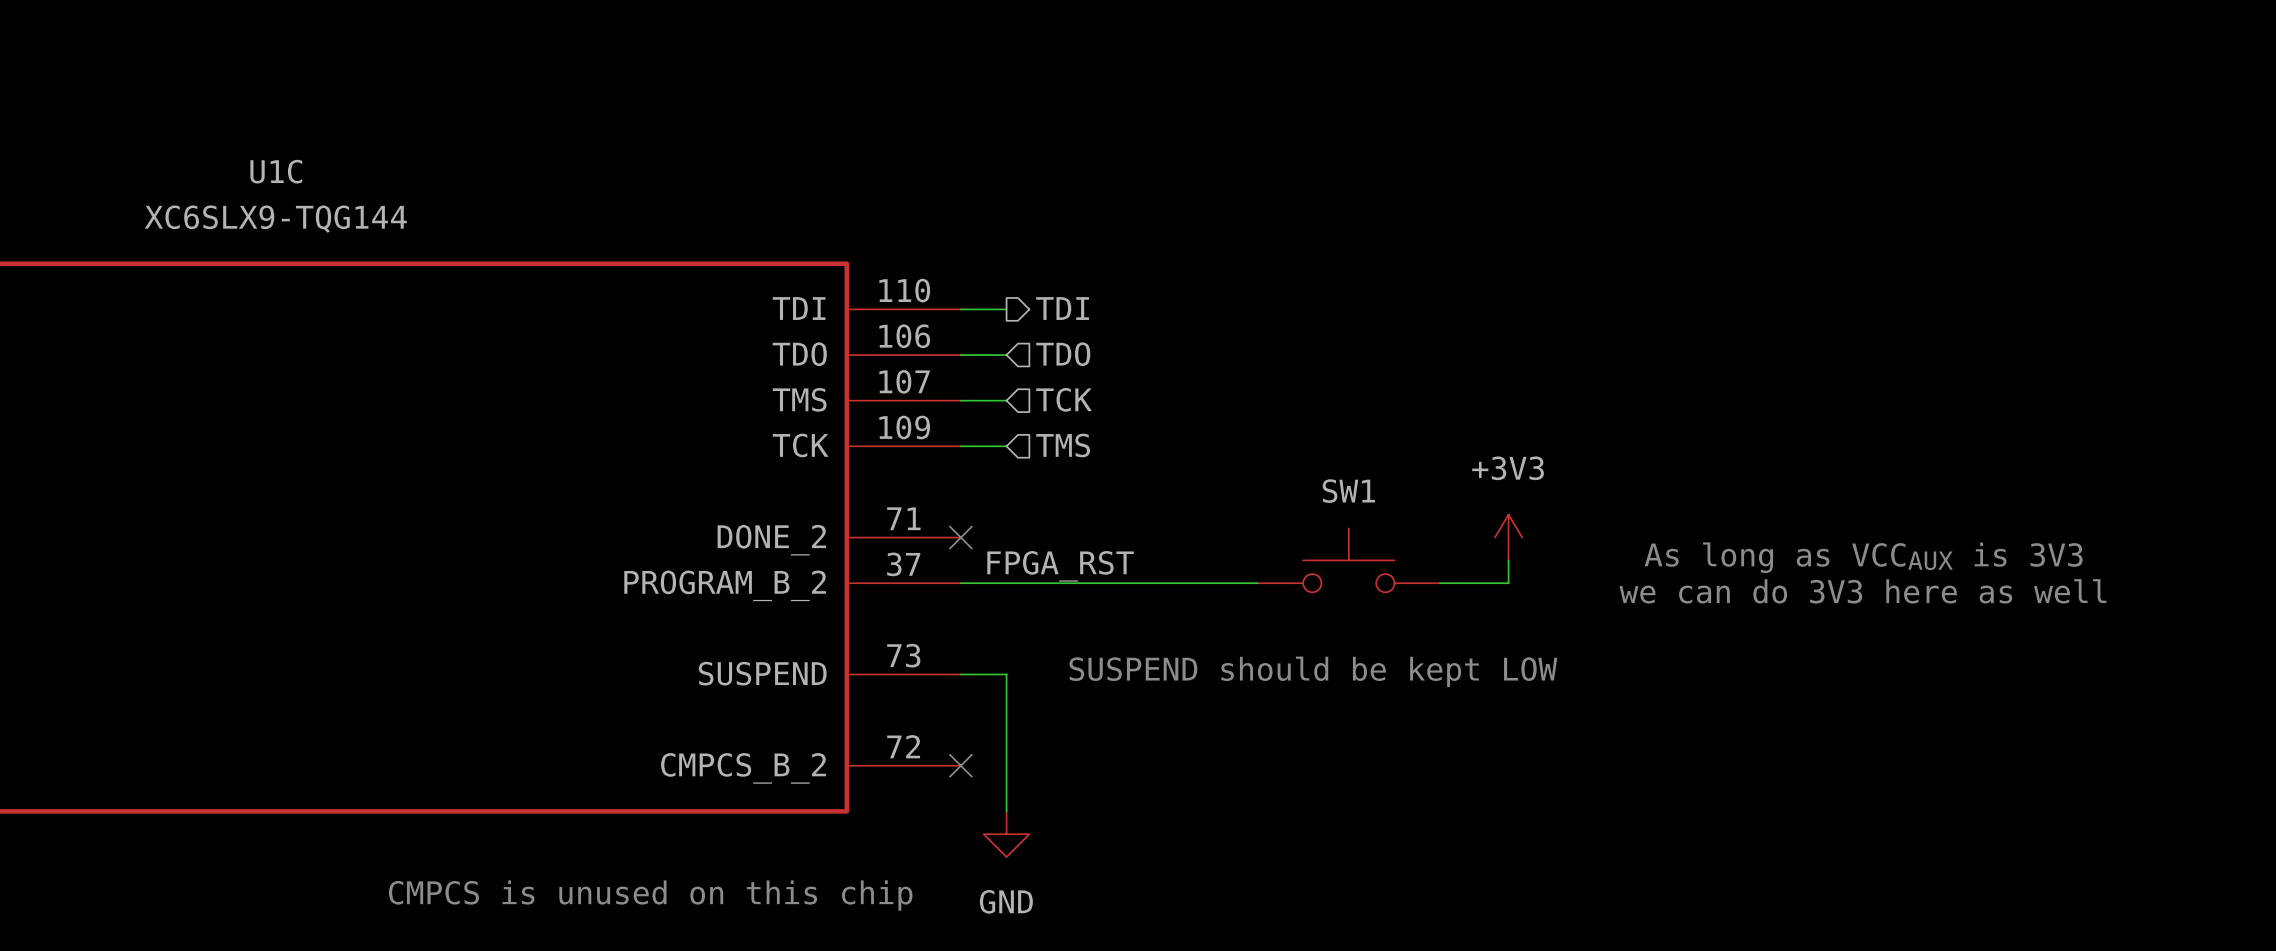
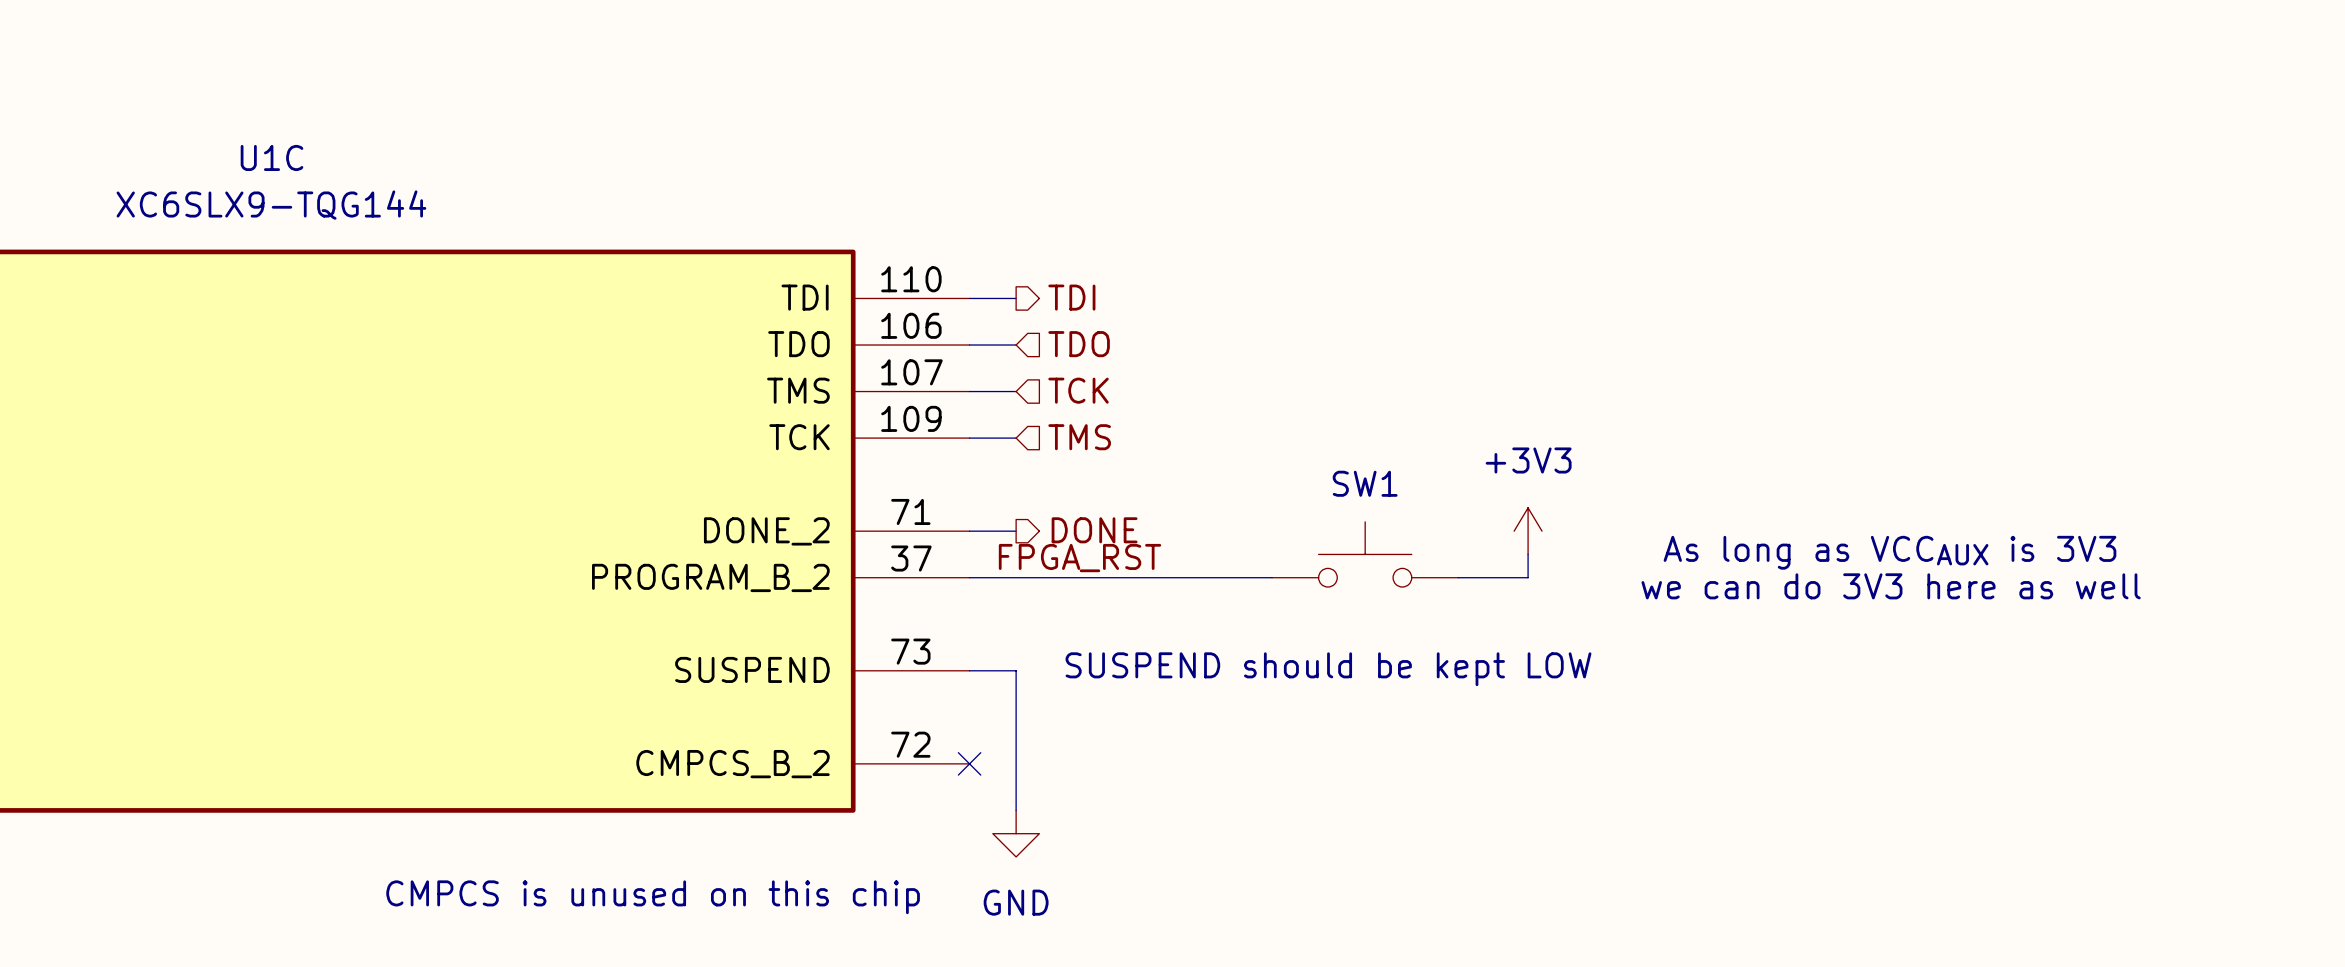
hierarchical label: none -> DONE (1094, 530)
wire: none -> (969, 531) (1016, 531)
no-connect mark: (960, 537) -> none

